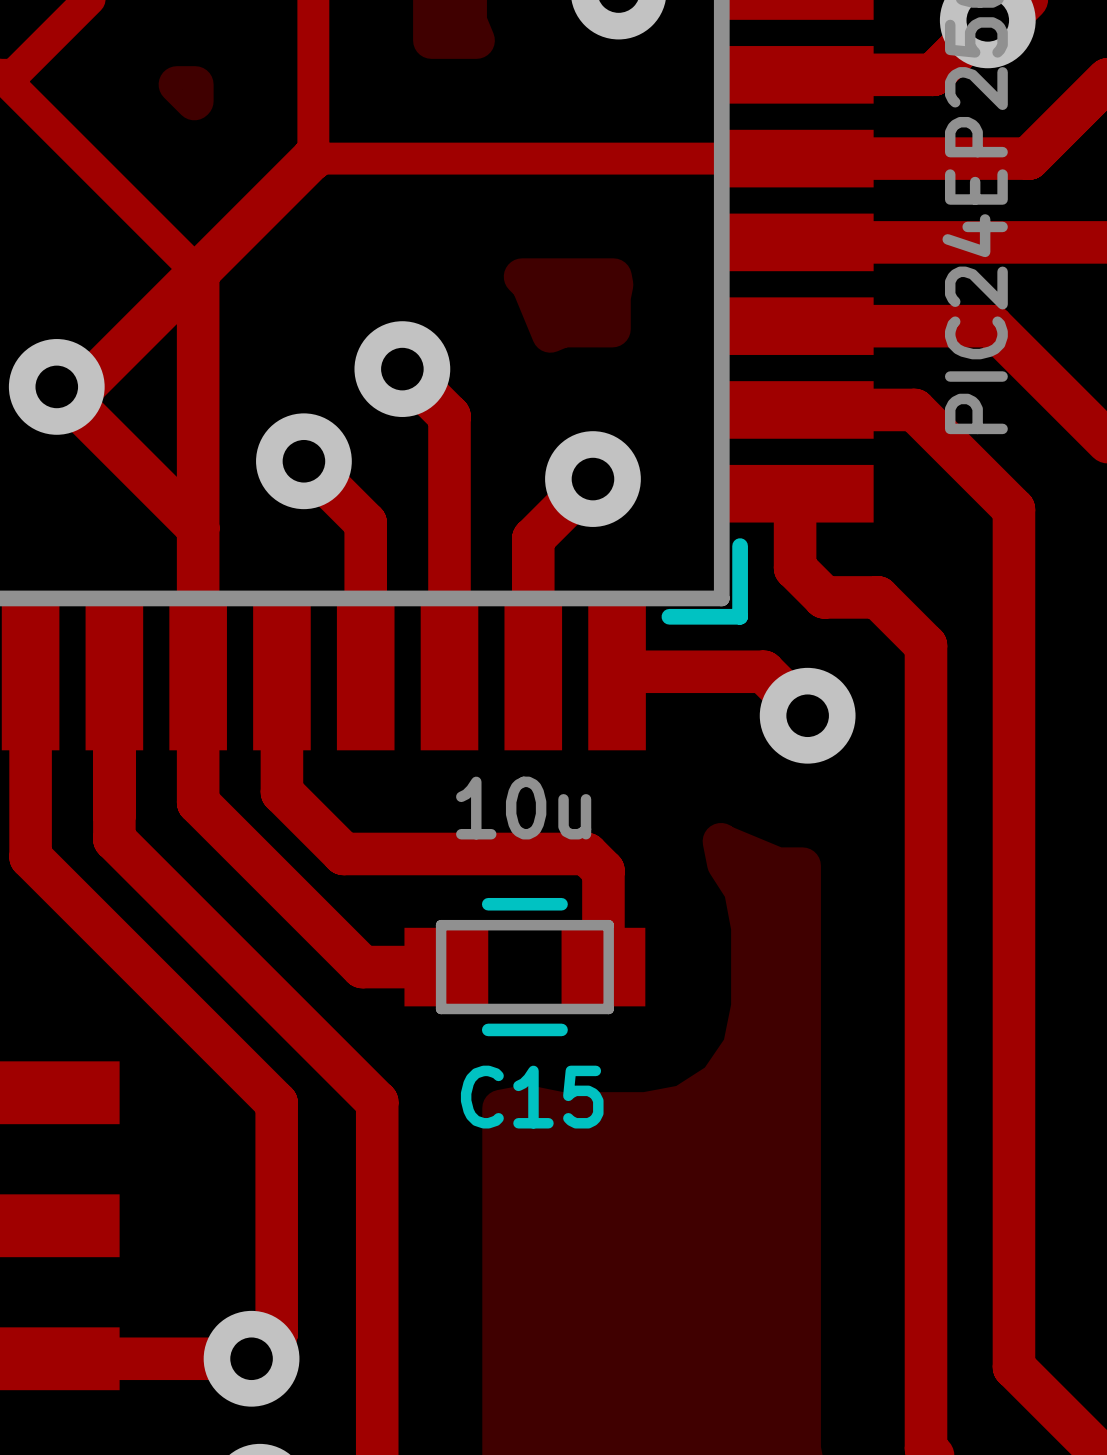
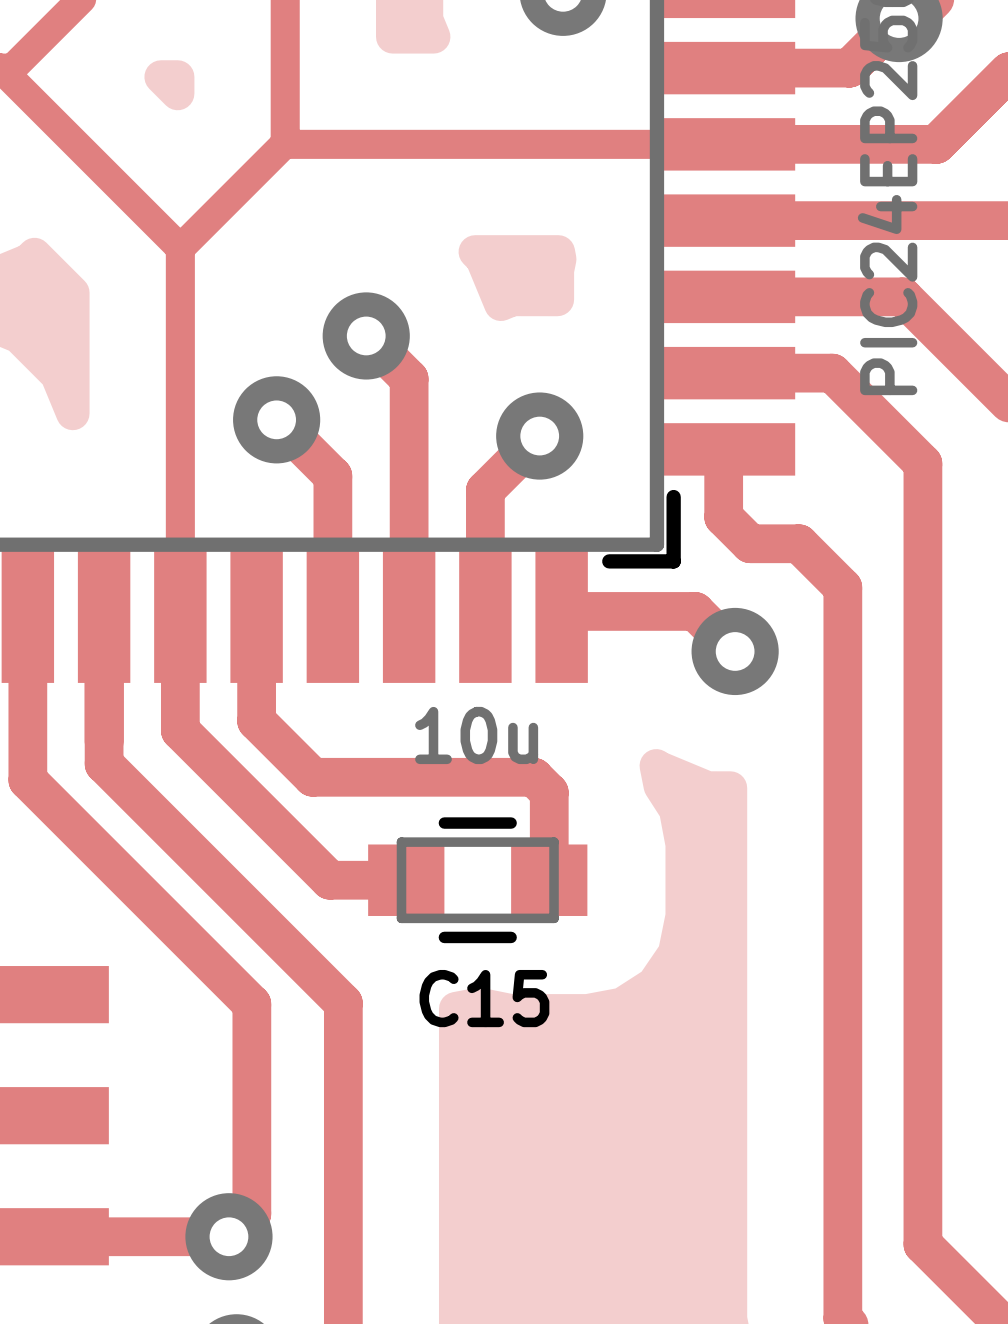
track width: thick (313, 157) (198, 272) -> thin (285, 143) (180, 248)
via: (56, 386) -> none
track: (198, 528) (56, 386) (84, 386) (198, 272) (198, 671) -> none

